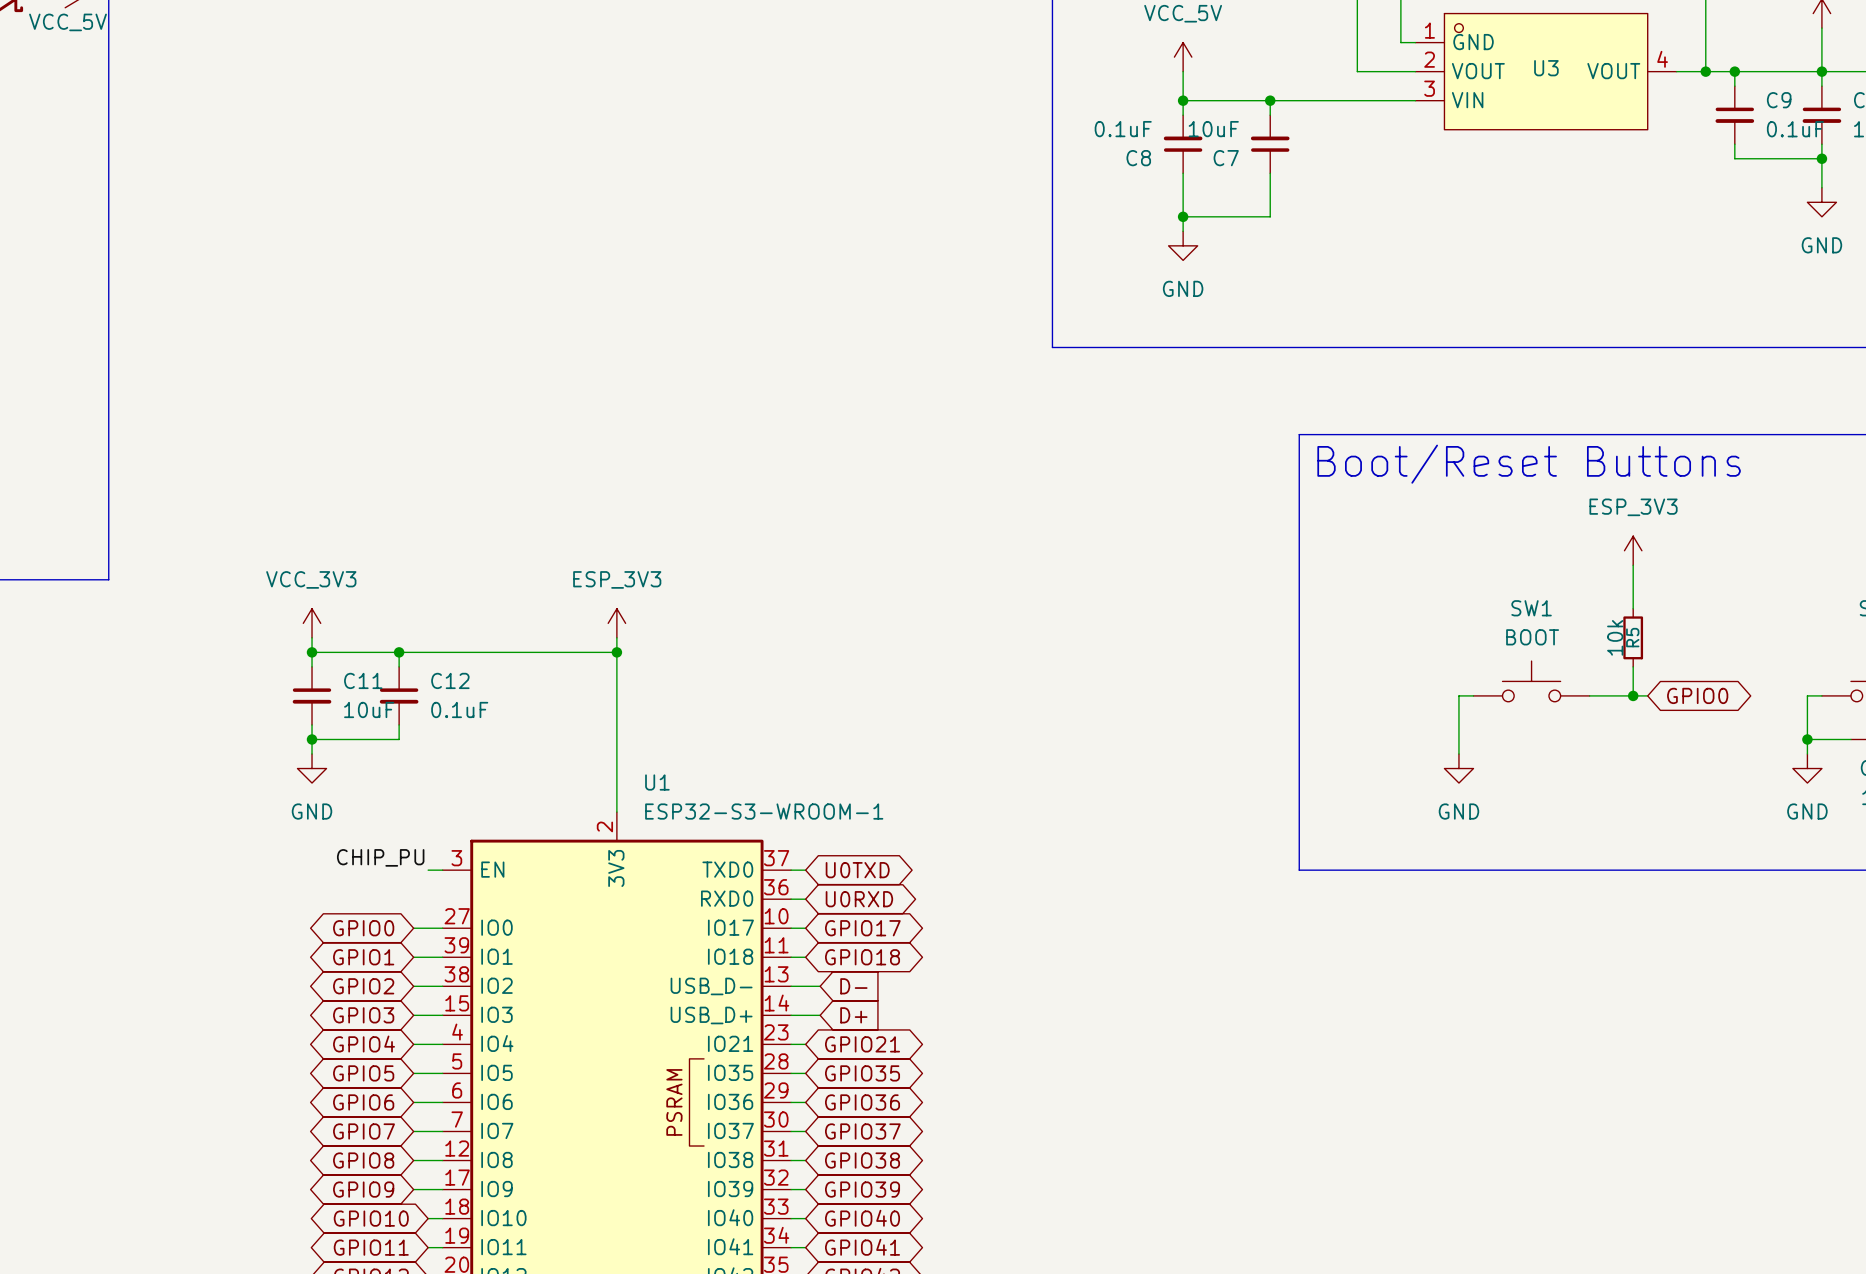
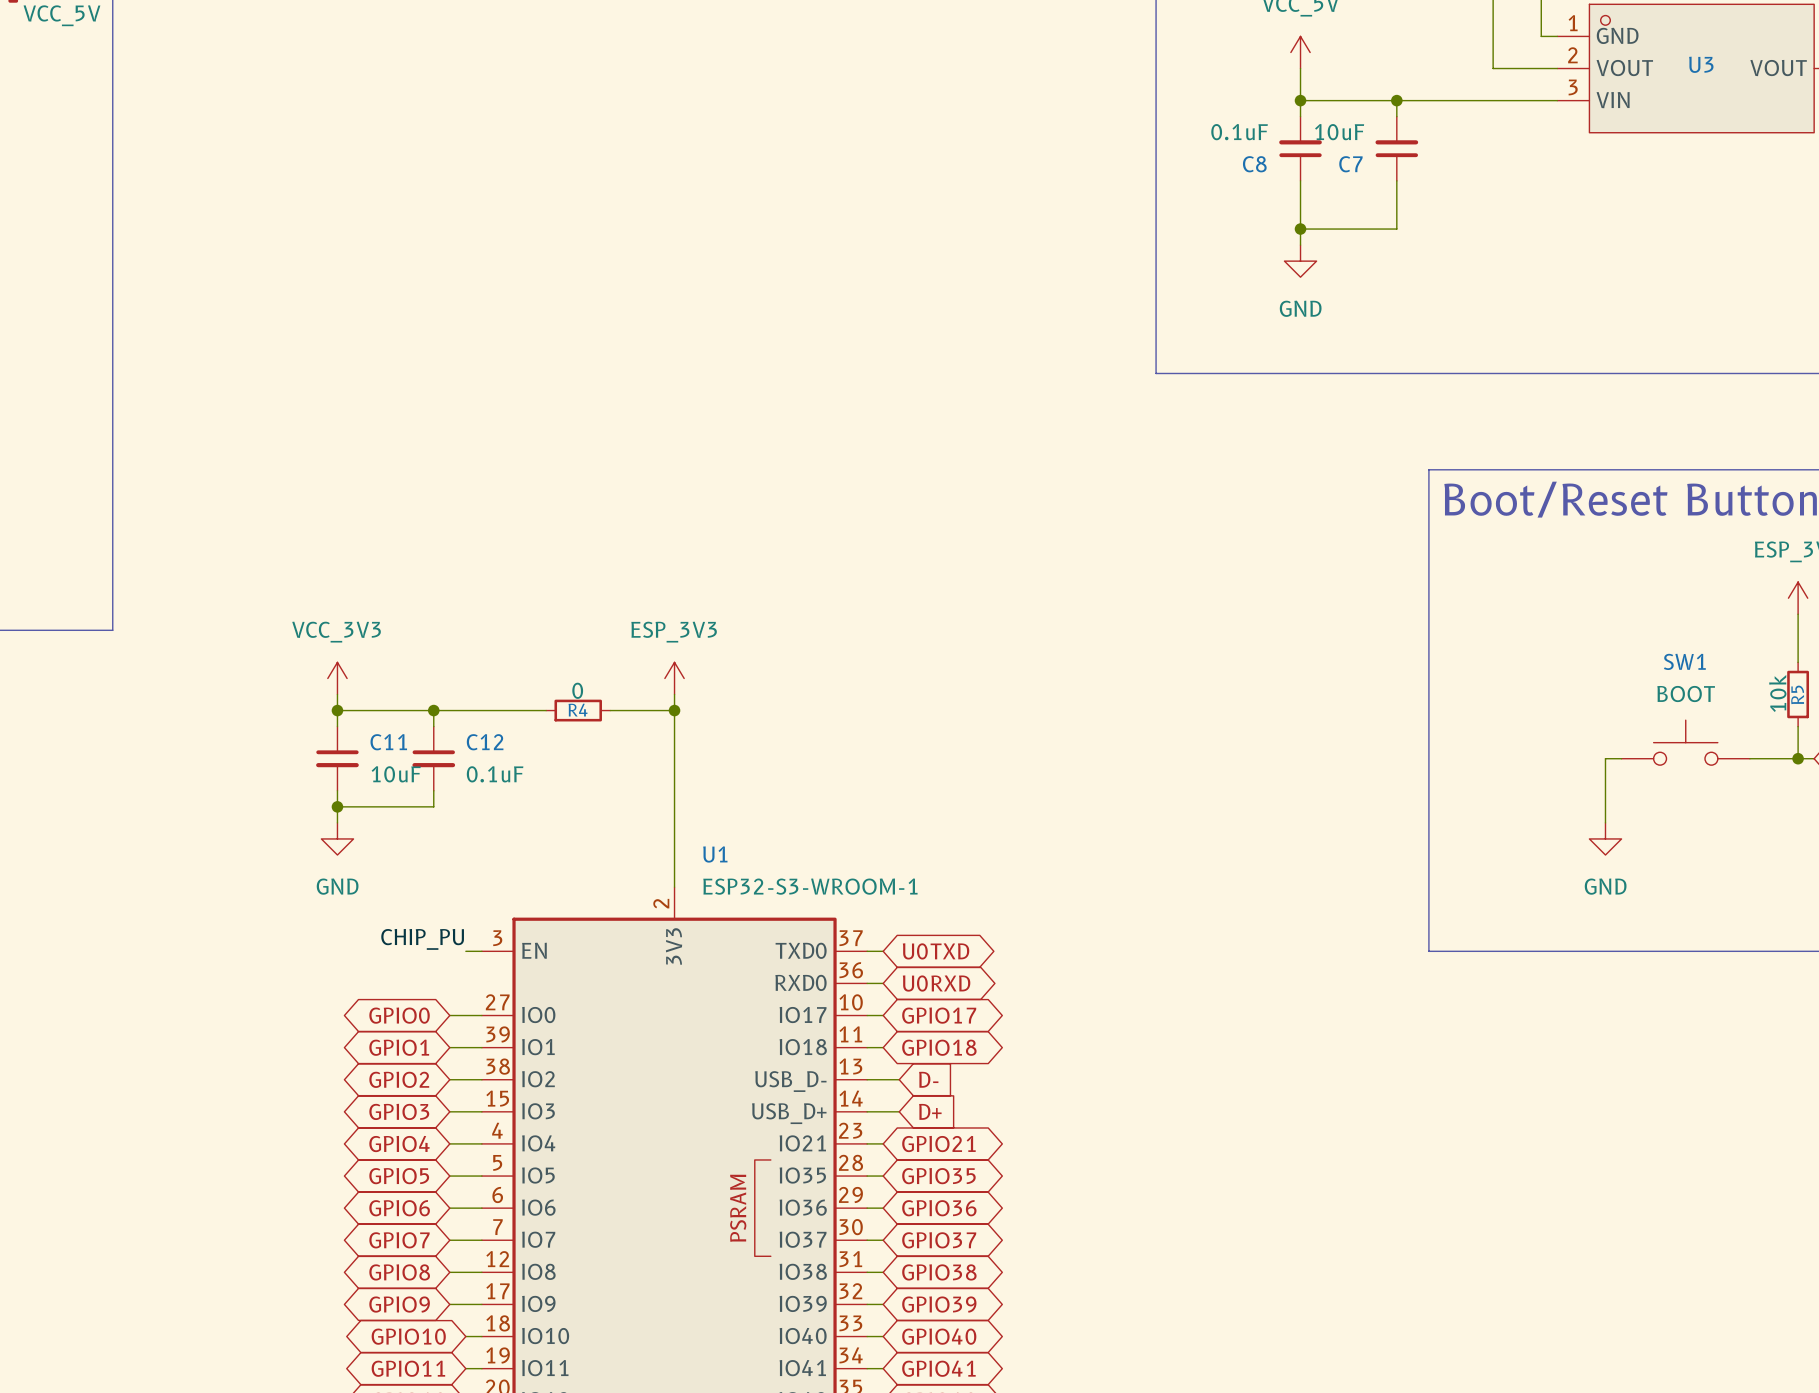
wire: (500, 652) (558, 652) -> none
R4: none -> 0 (578, 710)

